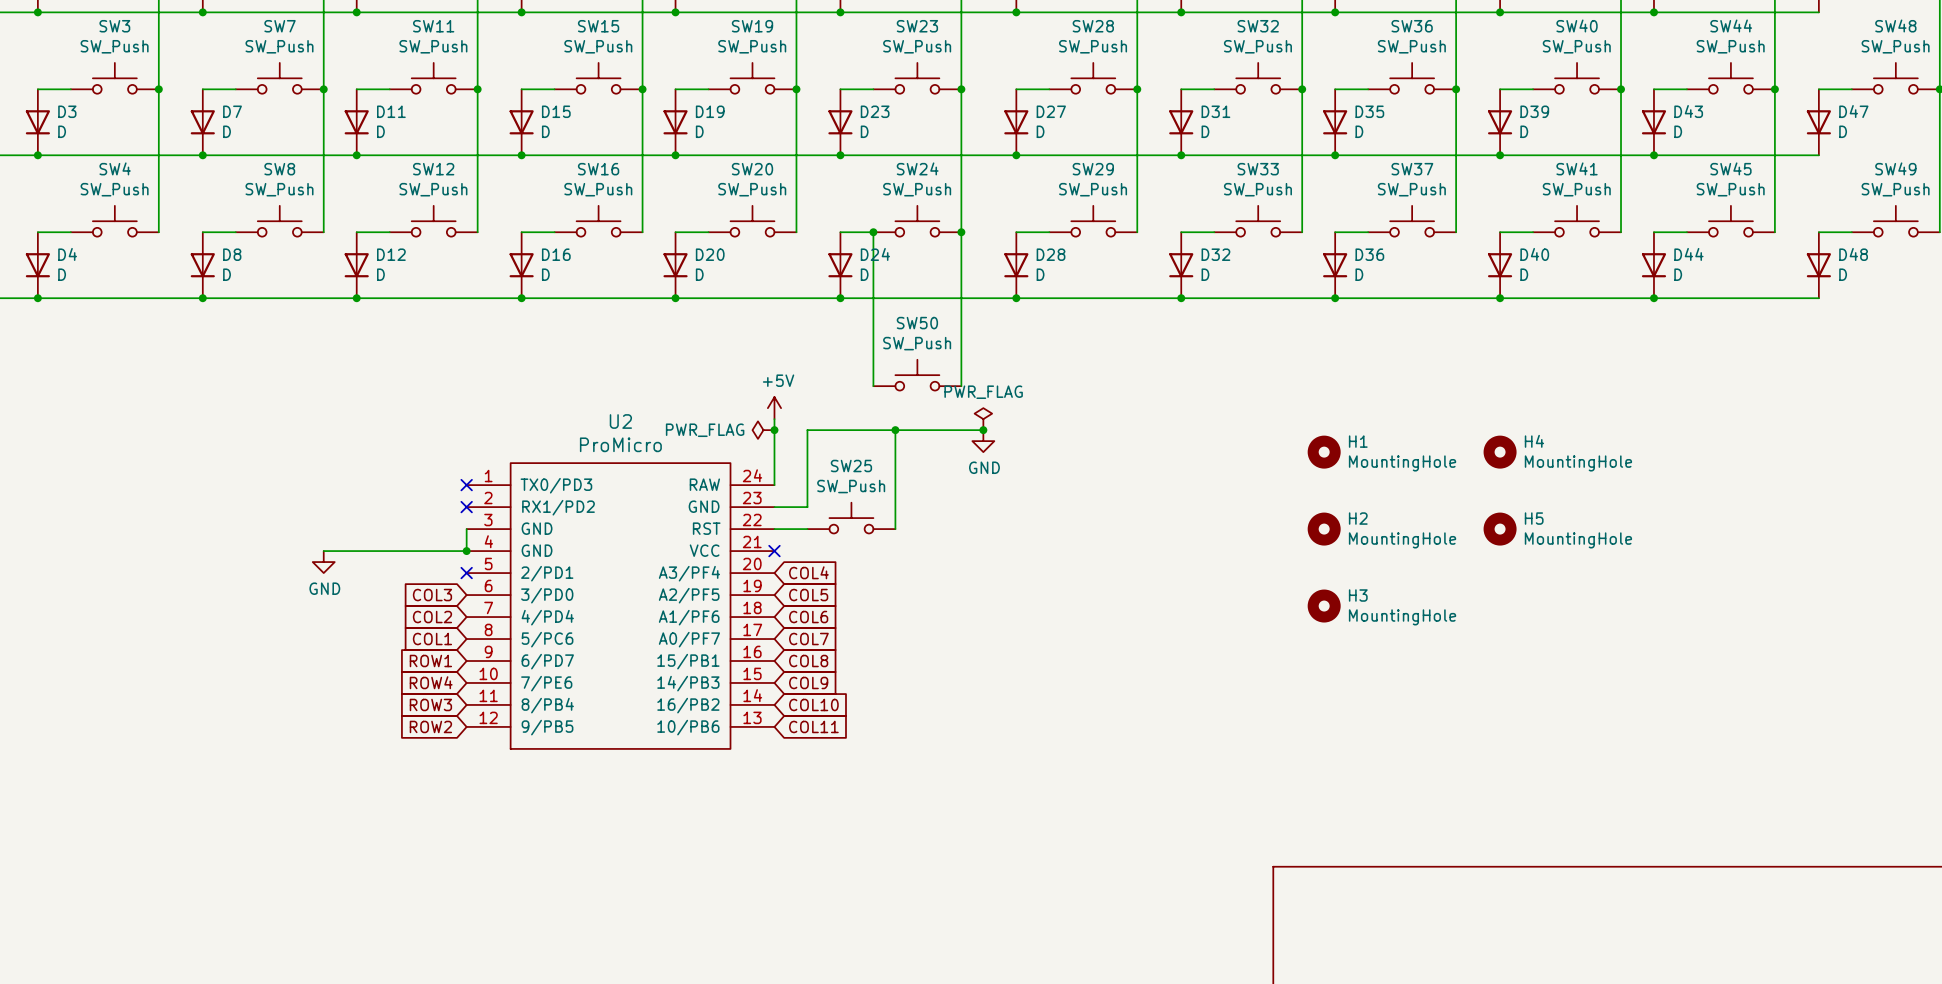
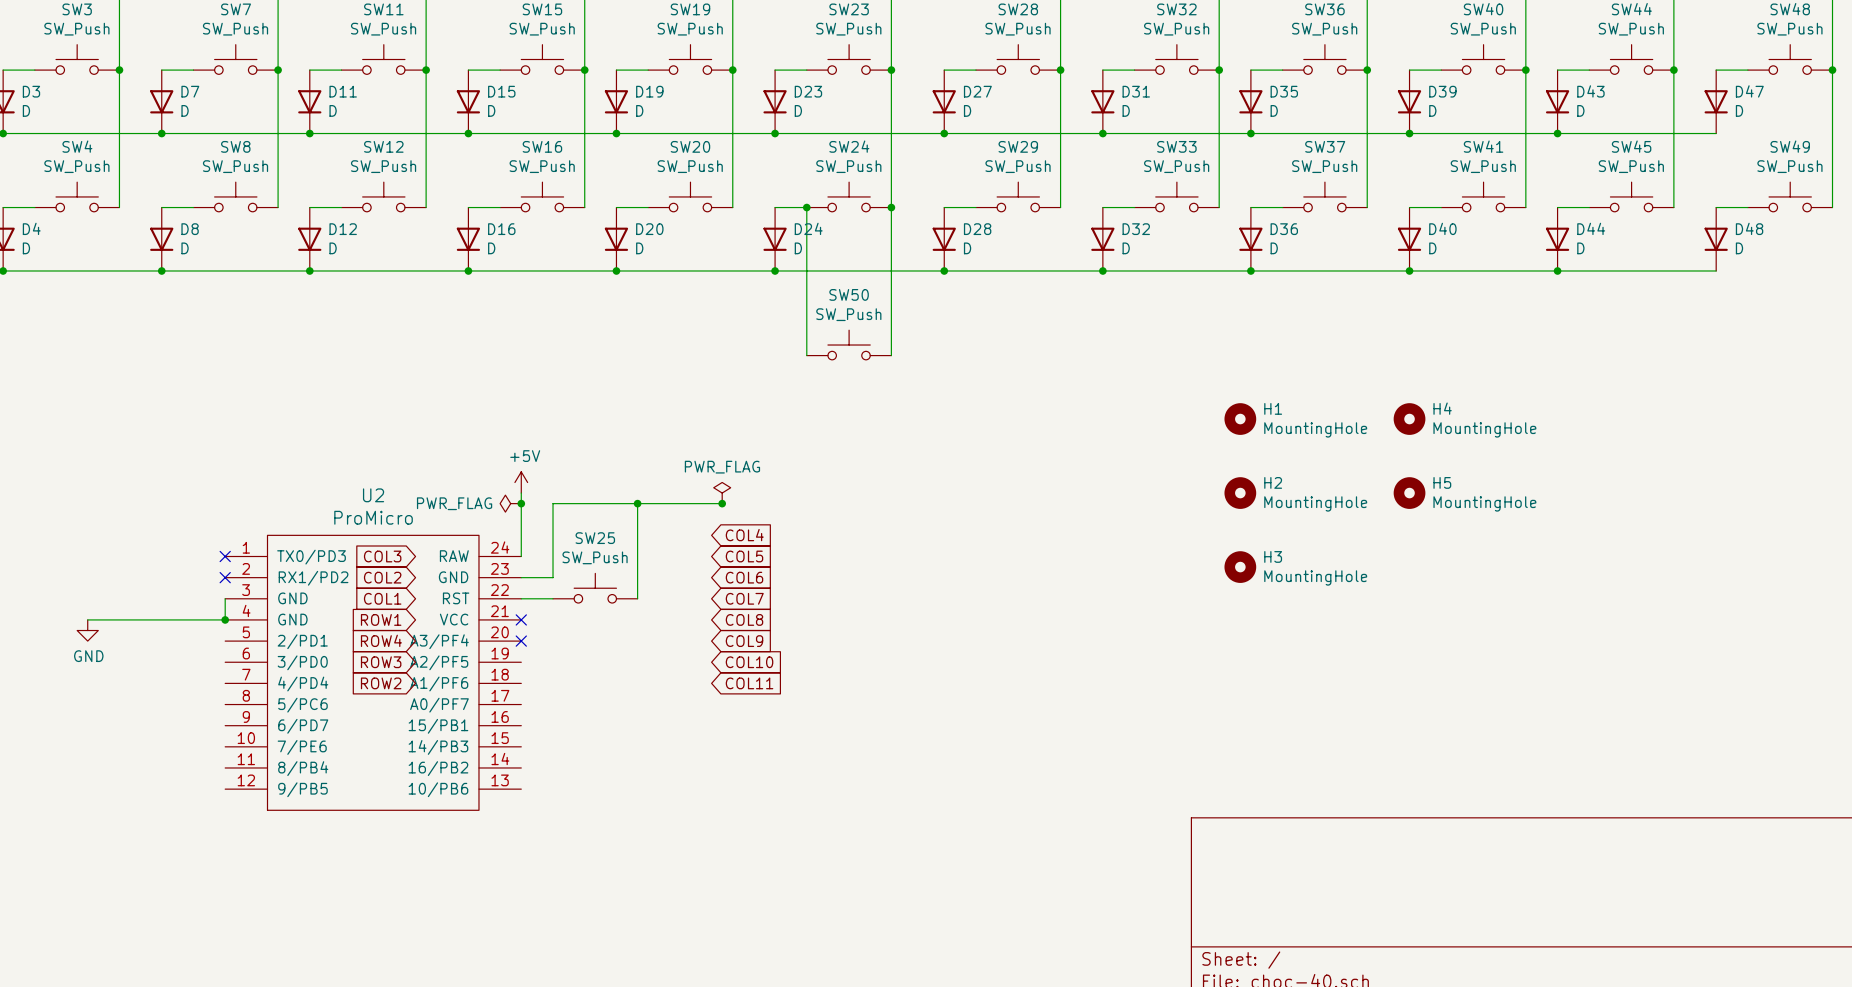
power symbol: +5V (774, 408) -> none
wire: (774, 419) (774, 485) -> none
power symbol: PWR_FLAG (983, 419) -> none
power symbol text position: PWR_FLAG (705, 430) -> PWR_FLAG (722, 467)
power symbol rotation: 0° (763, 430) -> 90° clockwise (722, 493)
power symbol position: PWR_FLAG (763, 430) -> PWR_FLAG (722, 493)
junction: (774, 430) -> none
wire: (895, 430) (895, 529) -> none
junction: (895, 430) -> none
wire: (983, 430) (807, 430) (807, 507) (774, 507) -> none
junction: (983, 430) -> none
power symbol: GND (983, 441) -> none
no-connect mark: (466, 485) -> none
no-connect mark: (466, 507) -> none
power symbol: none -> +5V (521, 482)
SW25 position: (851, 518) -> (595, 588)
wire: (466, 529) (466, 551) (323, 551) -> none
wire: none -> (521, 493) (521, 556)
wire: (774, 529) (807, 529) -> none
power symbol: none -> PWR_FLAG (510, 503)
junction: none -> (521, 503)
wire: none -> (637, 503) (637, 598)
junction: none -> (637, 503)
wire: none -> (722, 503) (553, 503) (553, 577) (521, 577)
junction: none -> (722, 503)
junction: (466, 551) -> none
no-connect mark: (774, 551) -> none
power symbol: GND (323, 562) -> none
no-connect mark: (466, 573) -> none
no-connect mark: none -> (225, 556)
U2 position: (620, 606) -> (373, 672)
no-connect mark: none -> (225, 577)
wire: none -> (225, 598) (225, 619) (87, 619)
wire: none -> (521, 598) (553, 598)
junction: none -> (225, 619)
no-connect mark: none -> (521, 619)
power symbol: none -> GND (87, 630)
no-connect mark: none -> (521, 641)

